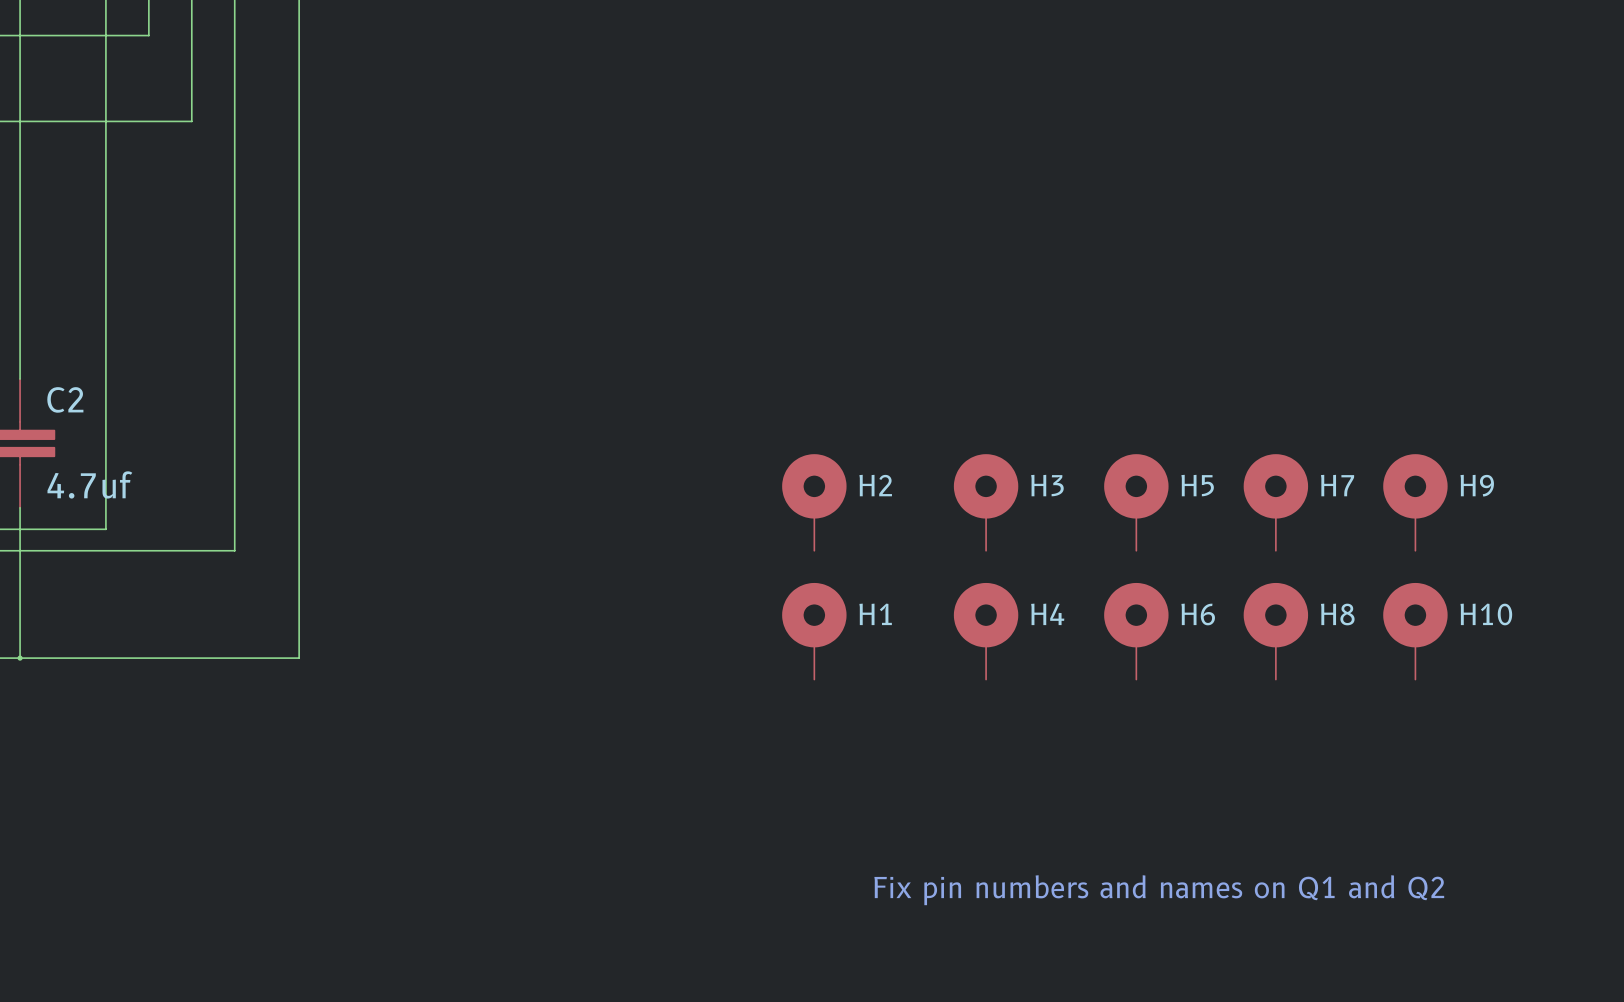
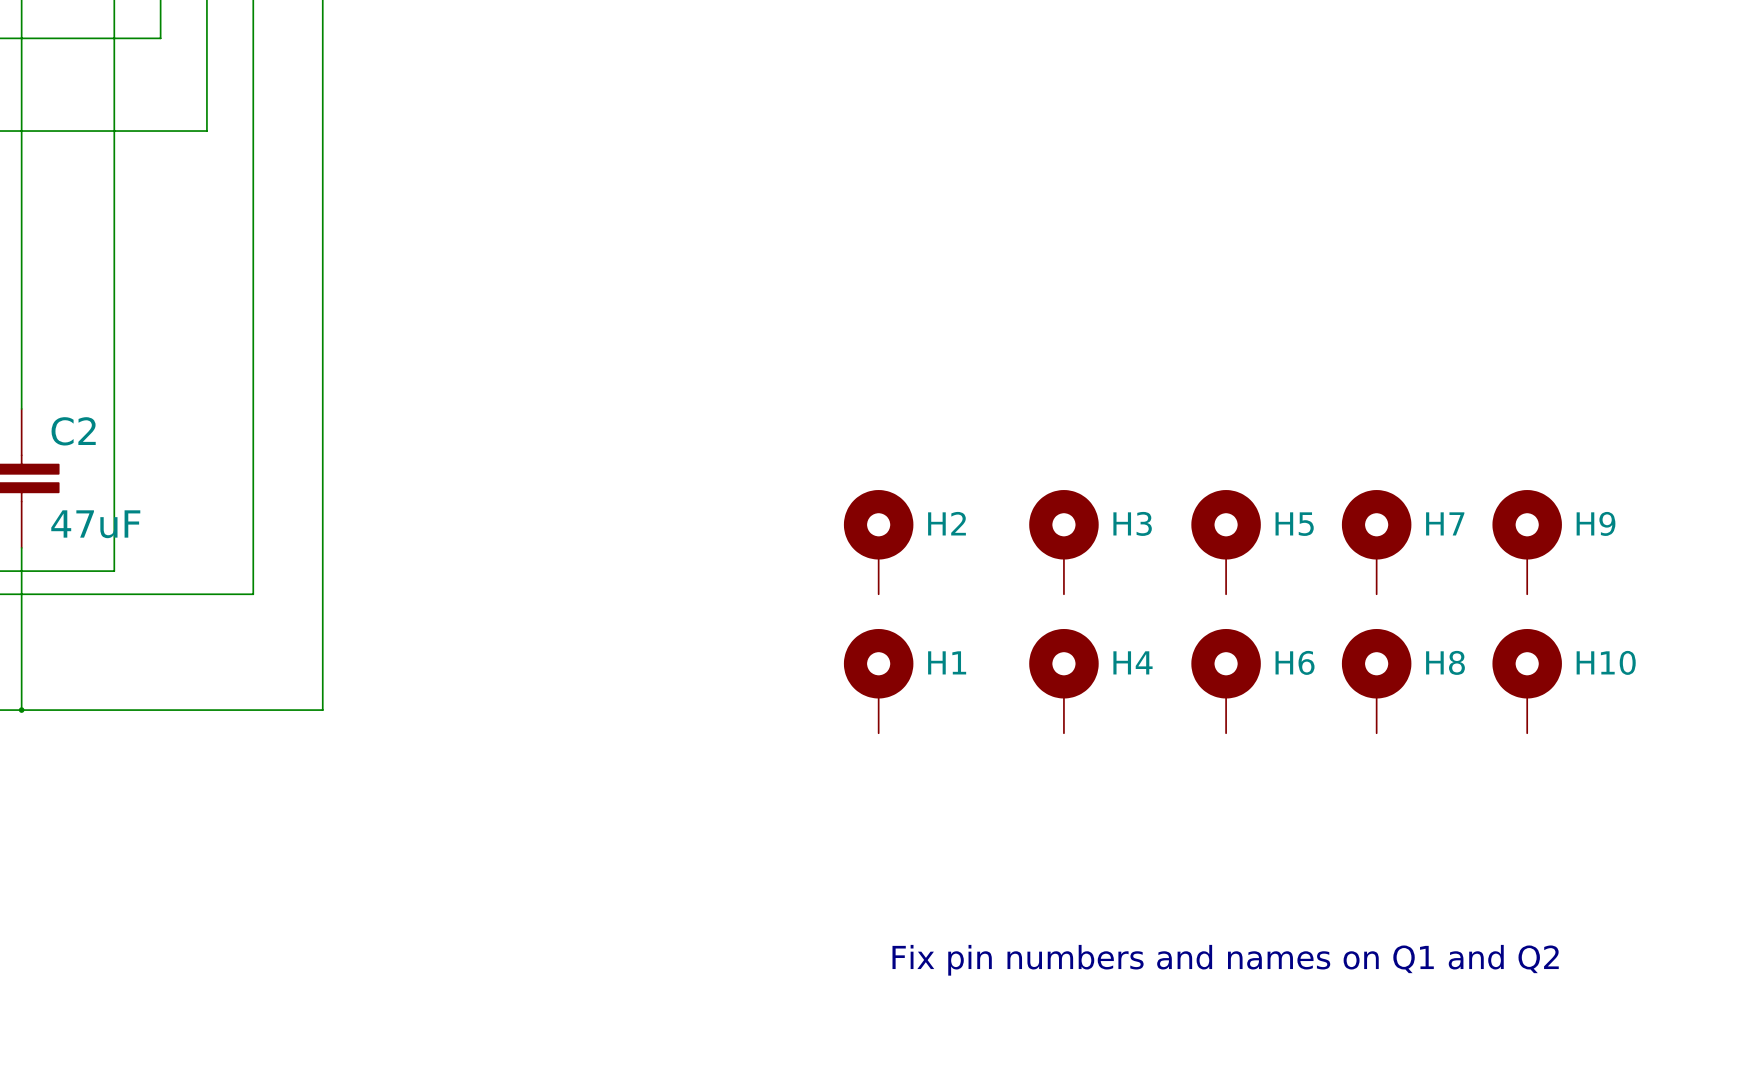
C2 value: 4.7uf (89, 484) -> 47uF (95, 524)

